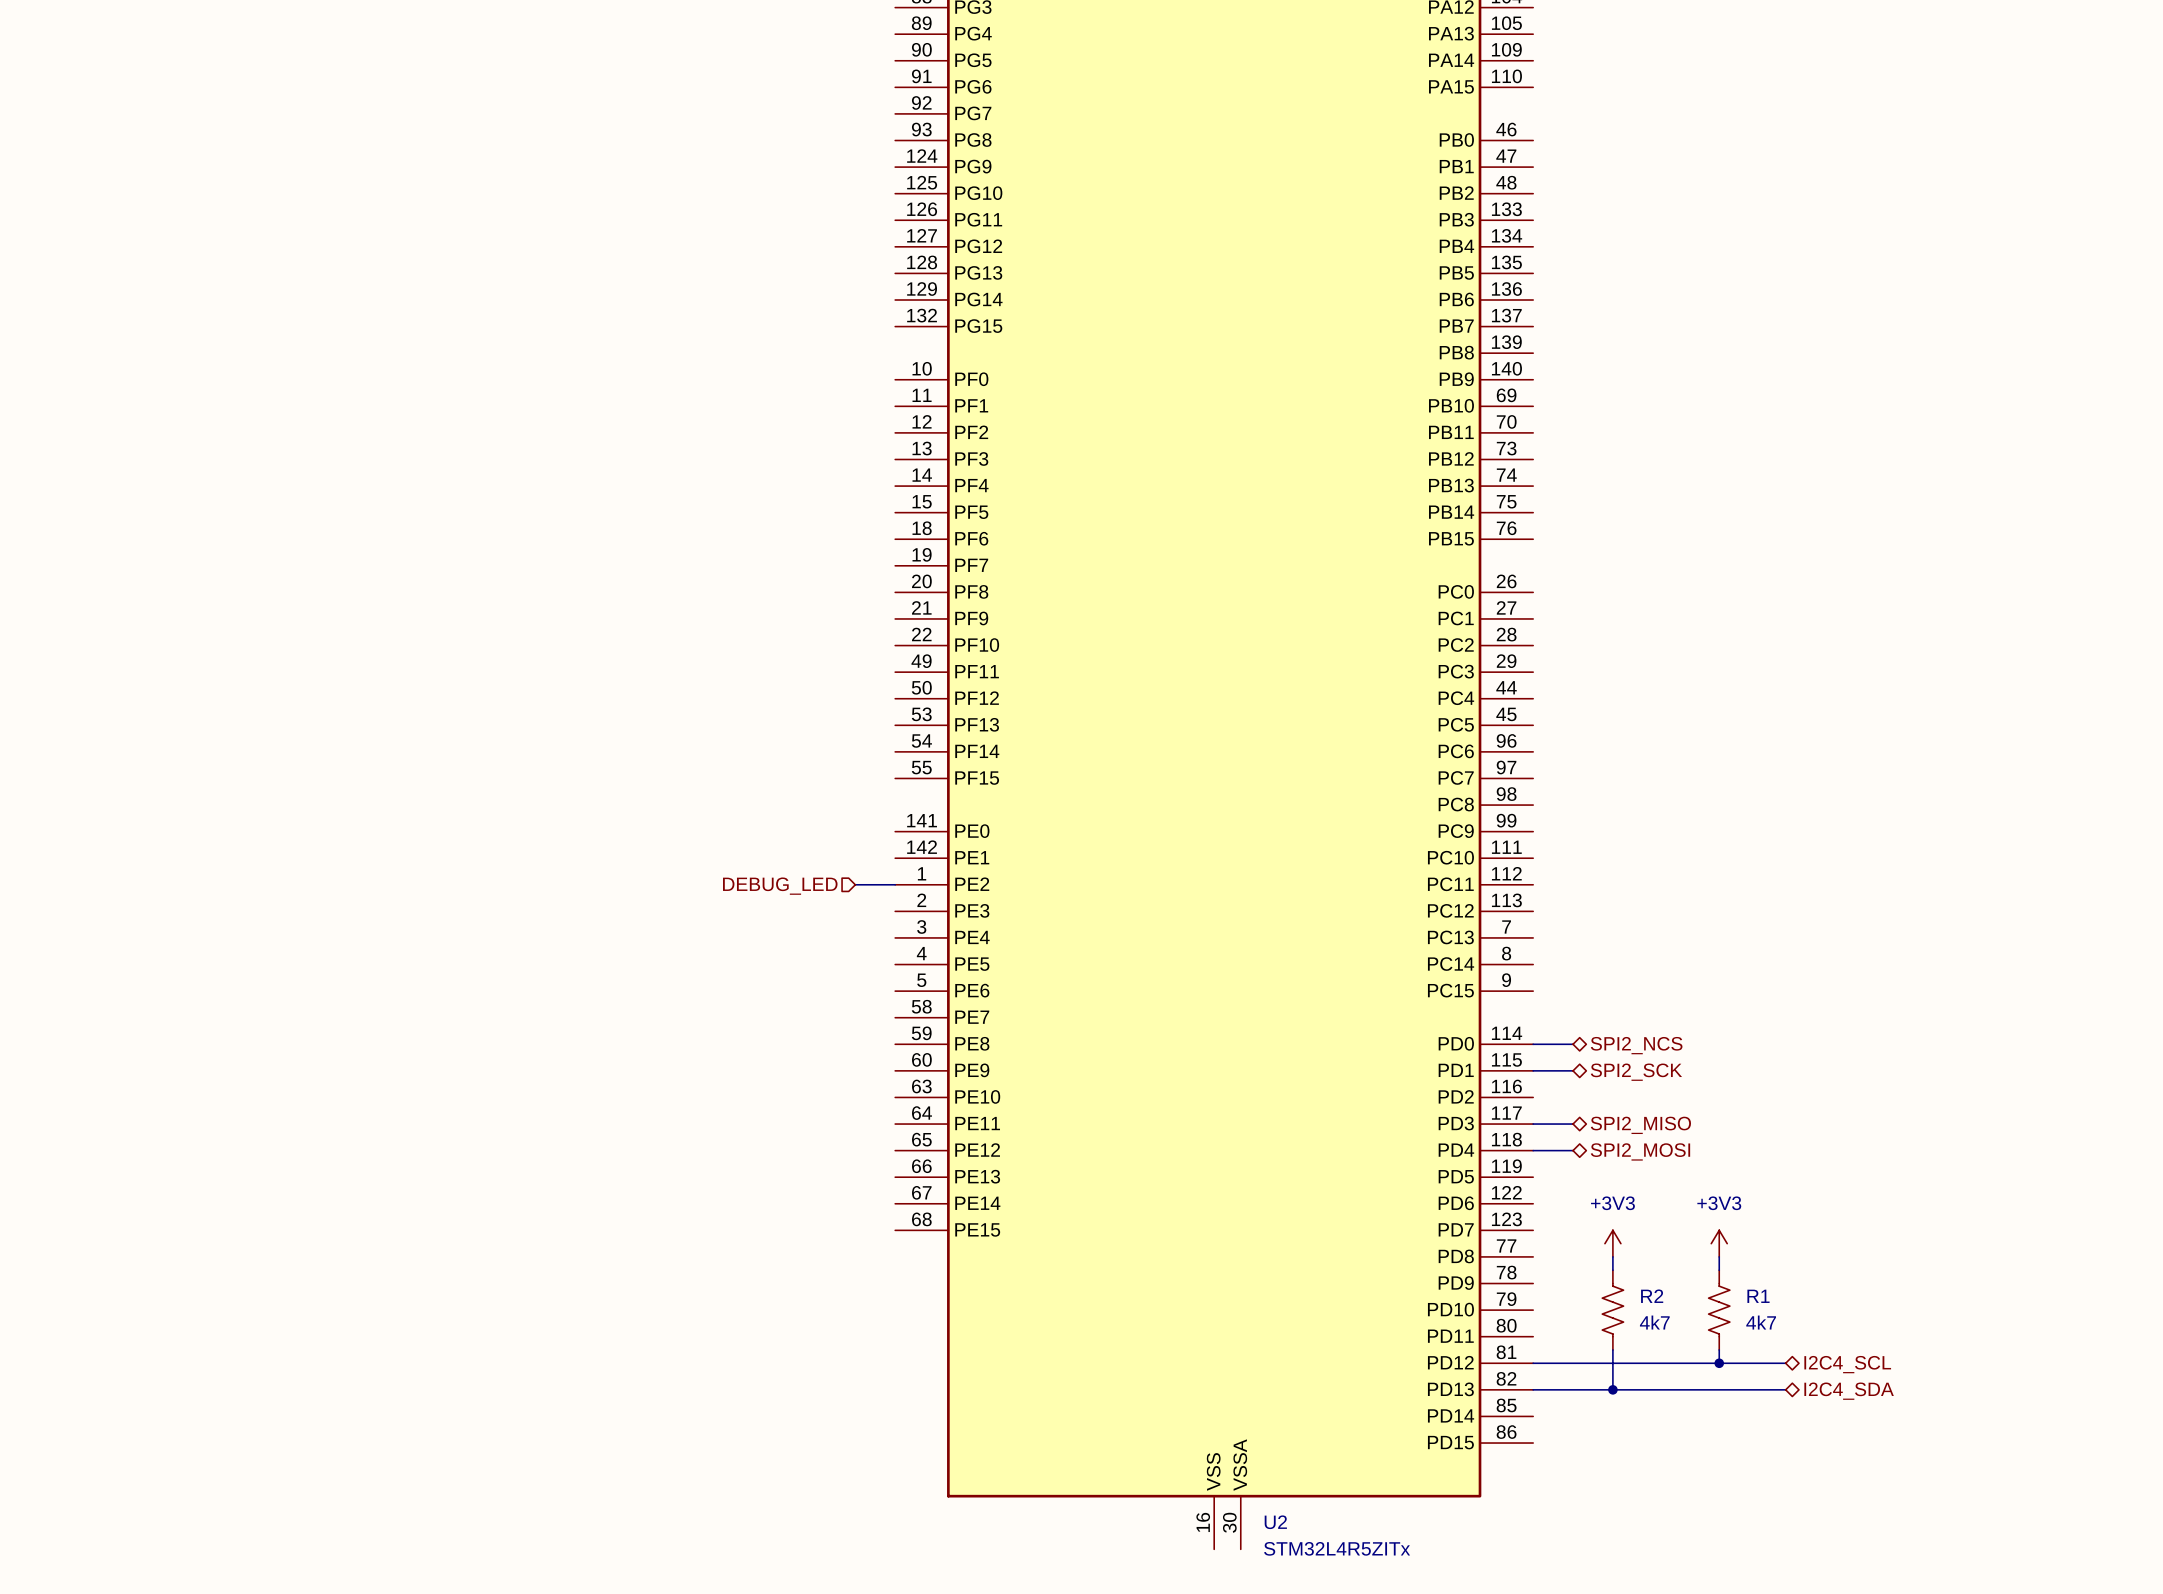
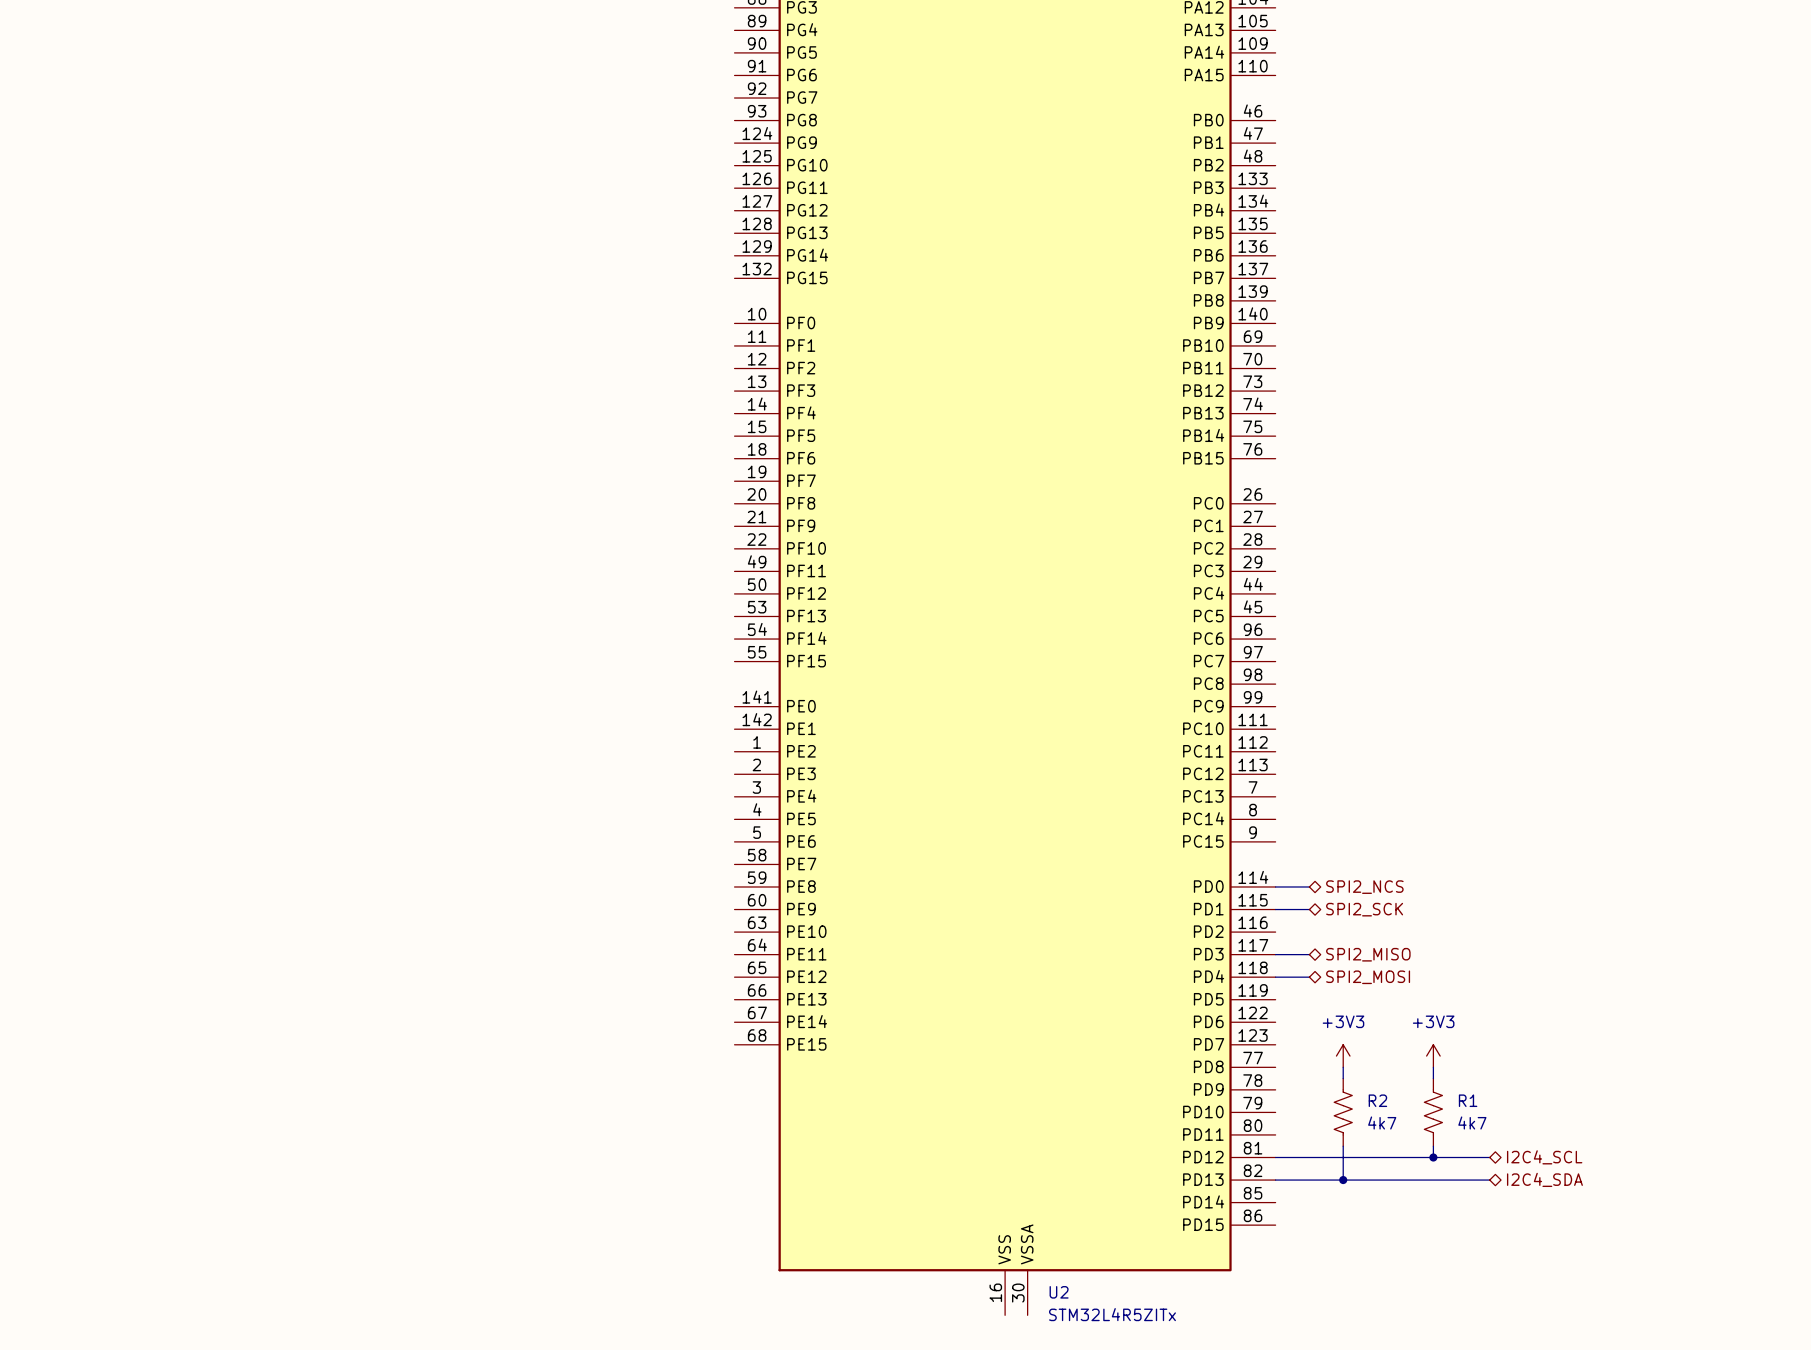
wire: (855, 884) (895, 884) -> none
hierarchical label: DEBUG_LED (780, 886) -> none

